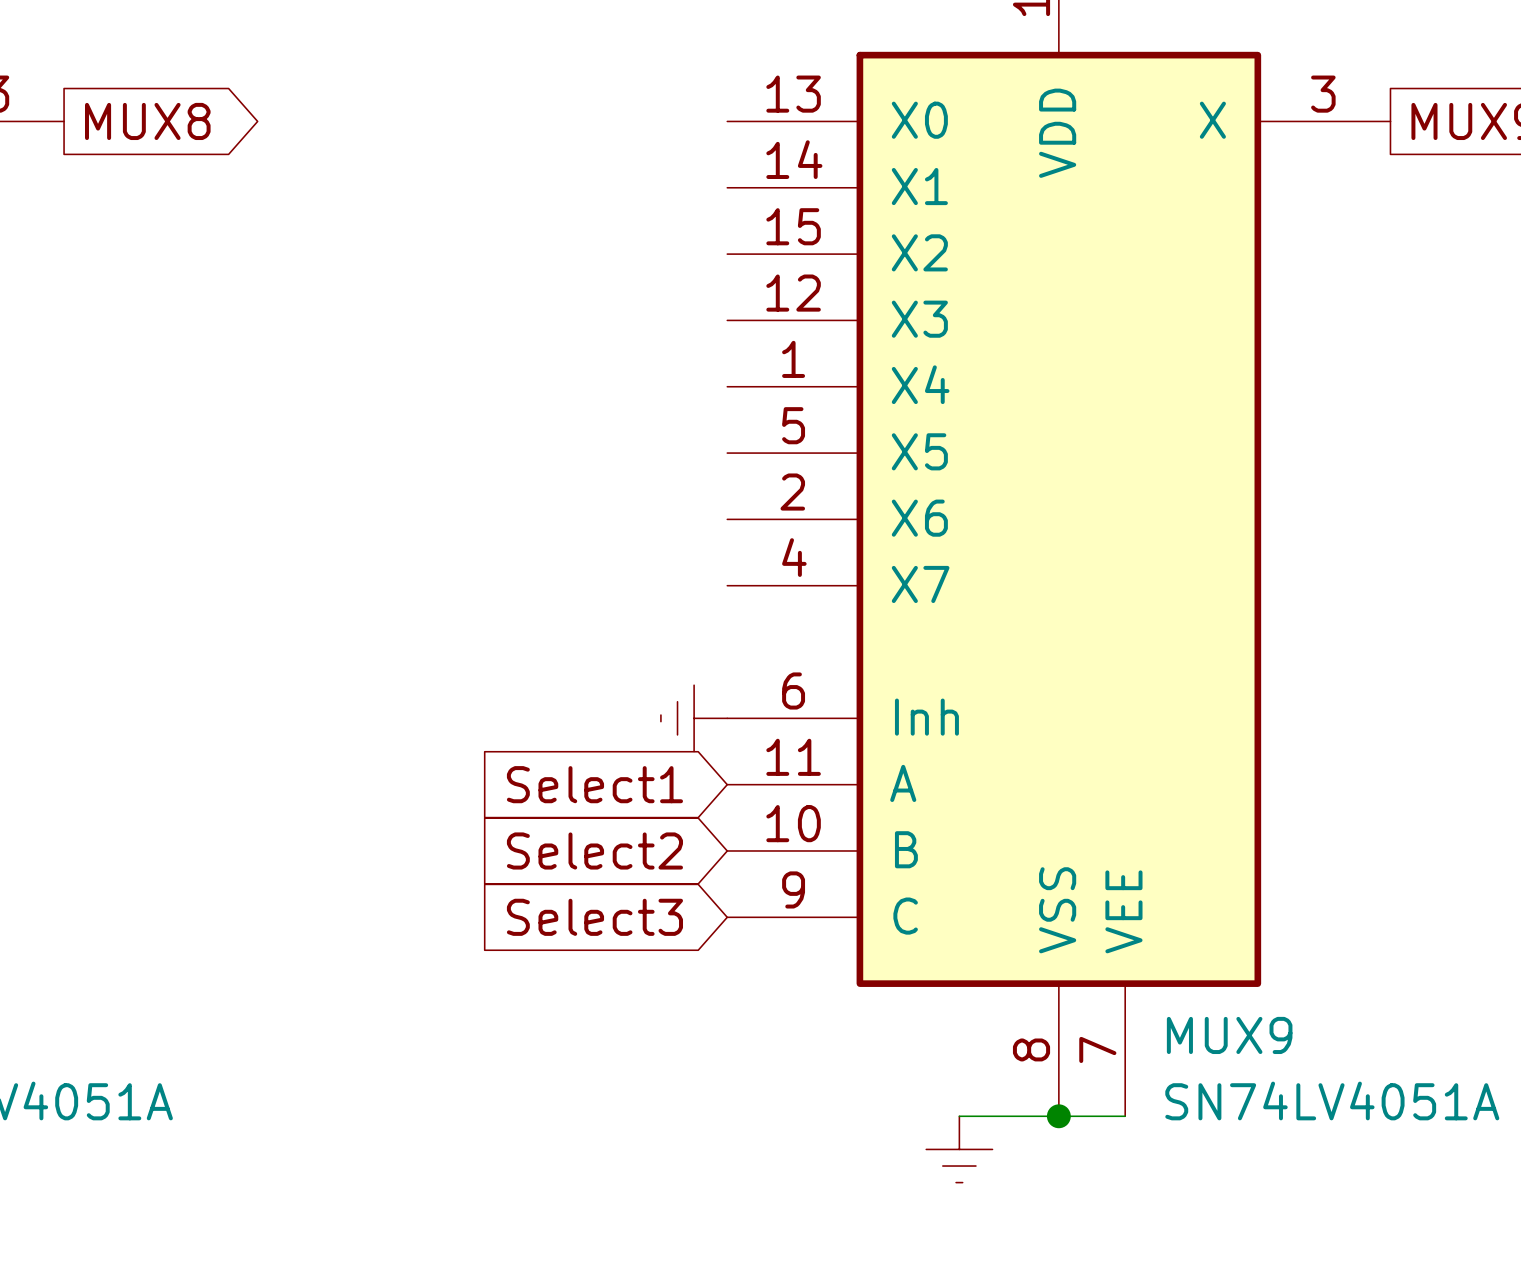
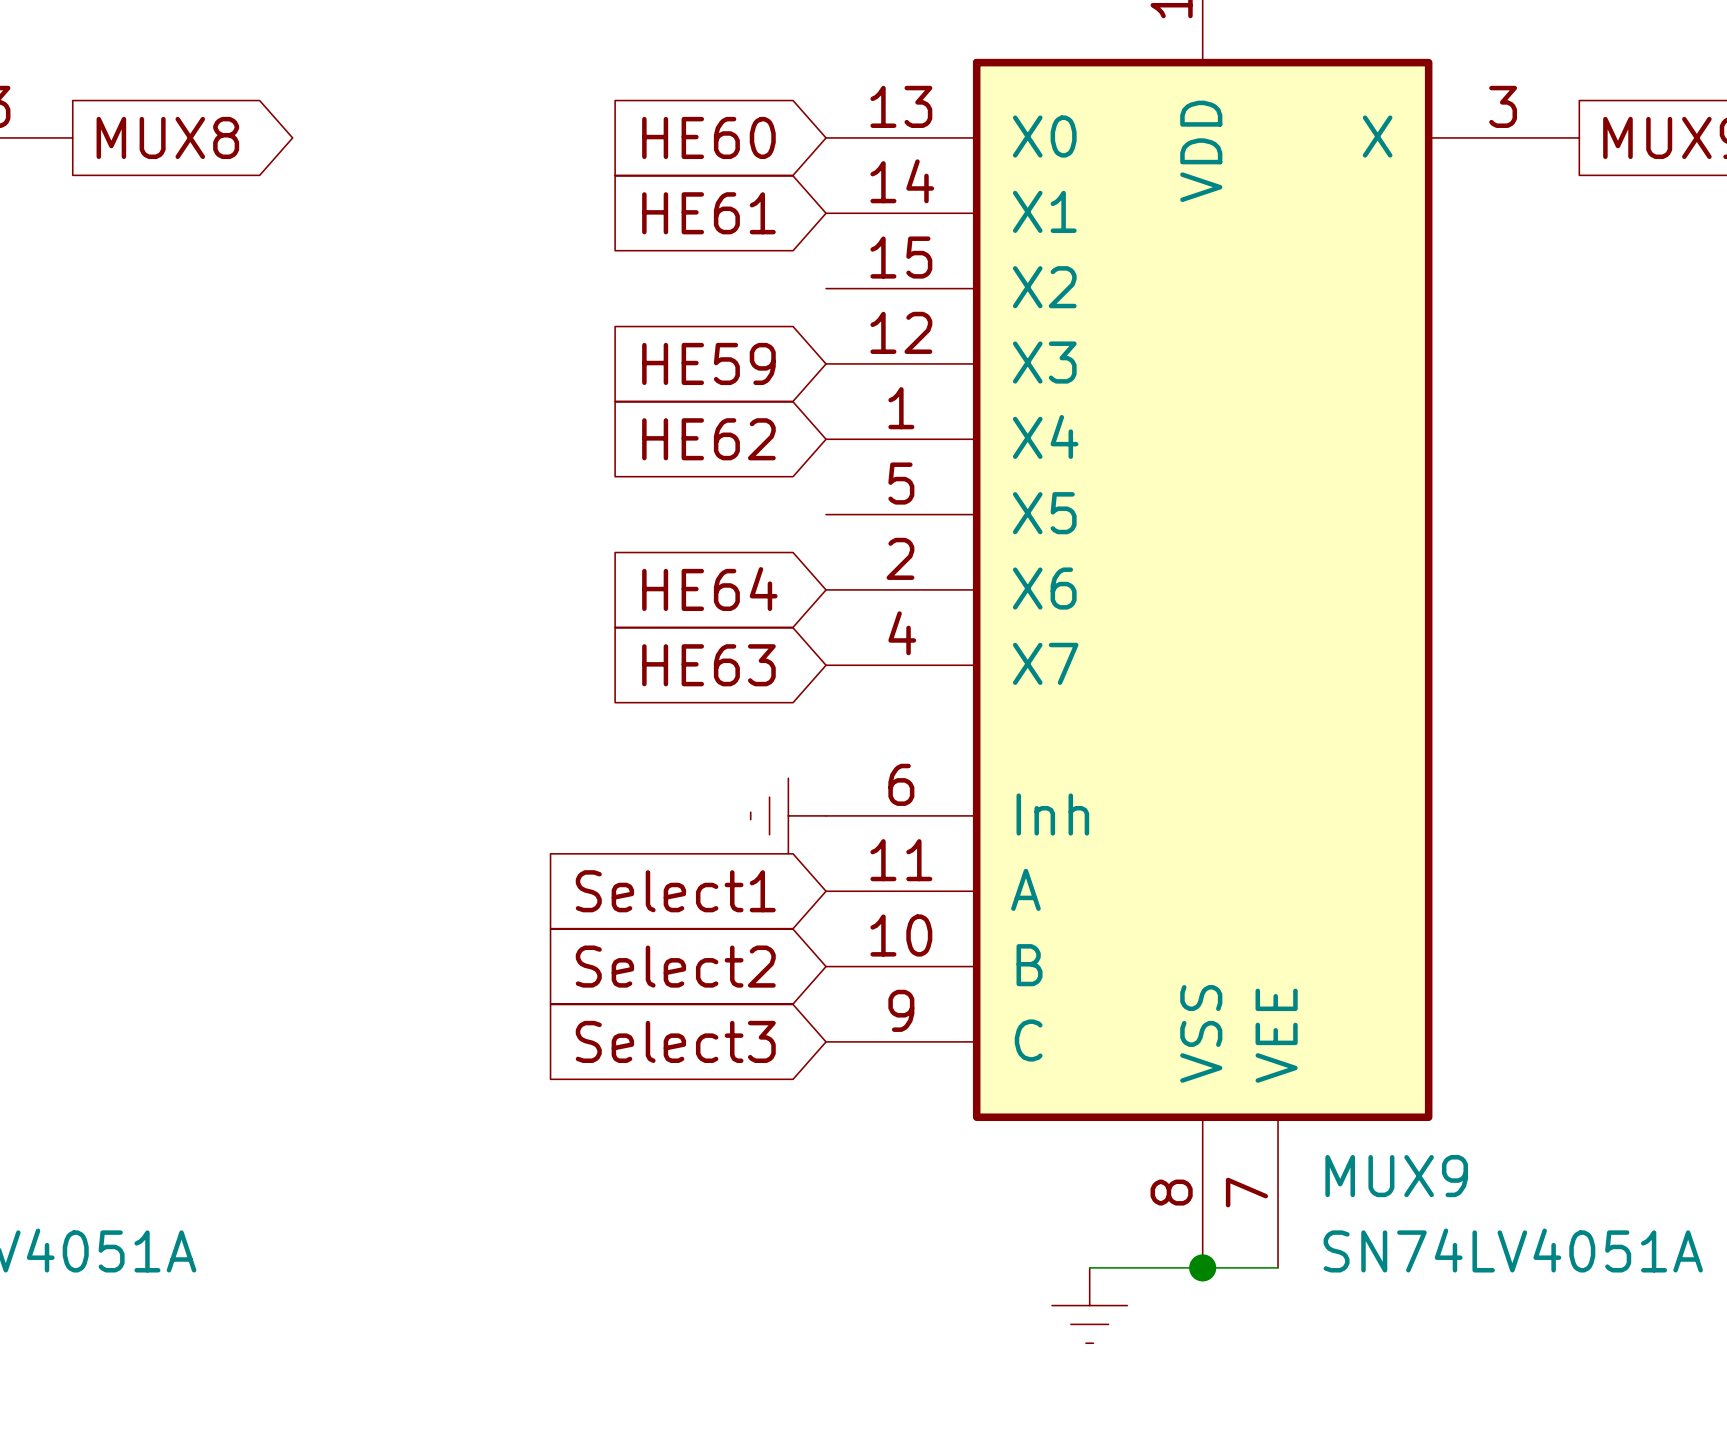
global label: none -> HE60 (708, 137)
global label: none -> HE61 (708, 213)
global label: none -> HE59 (708, 363)
global label: none -> HE62 (708, 439)
global label: none -> HE64 (709, 589)
global label: none -> HE63 (708, 665)

